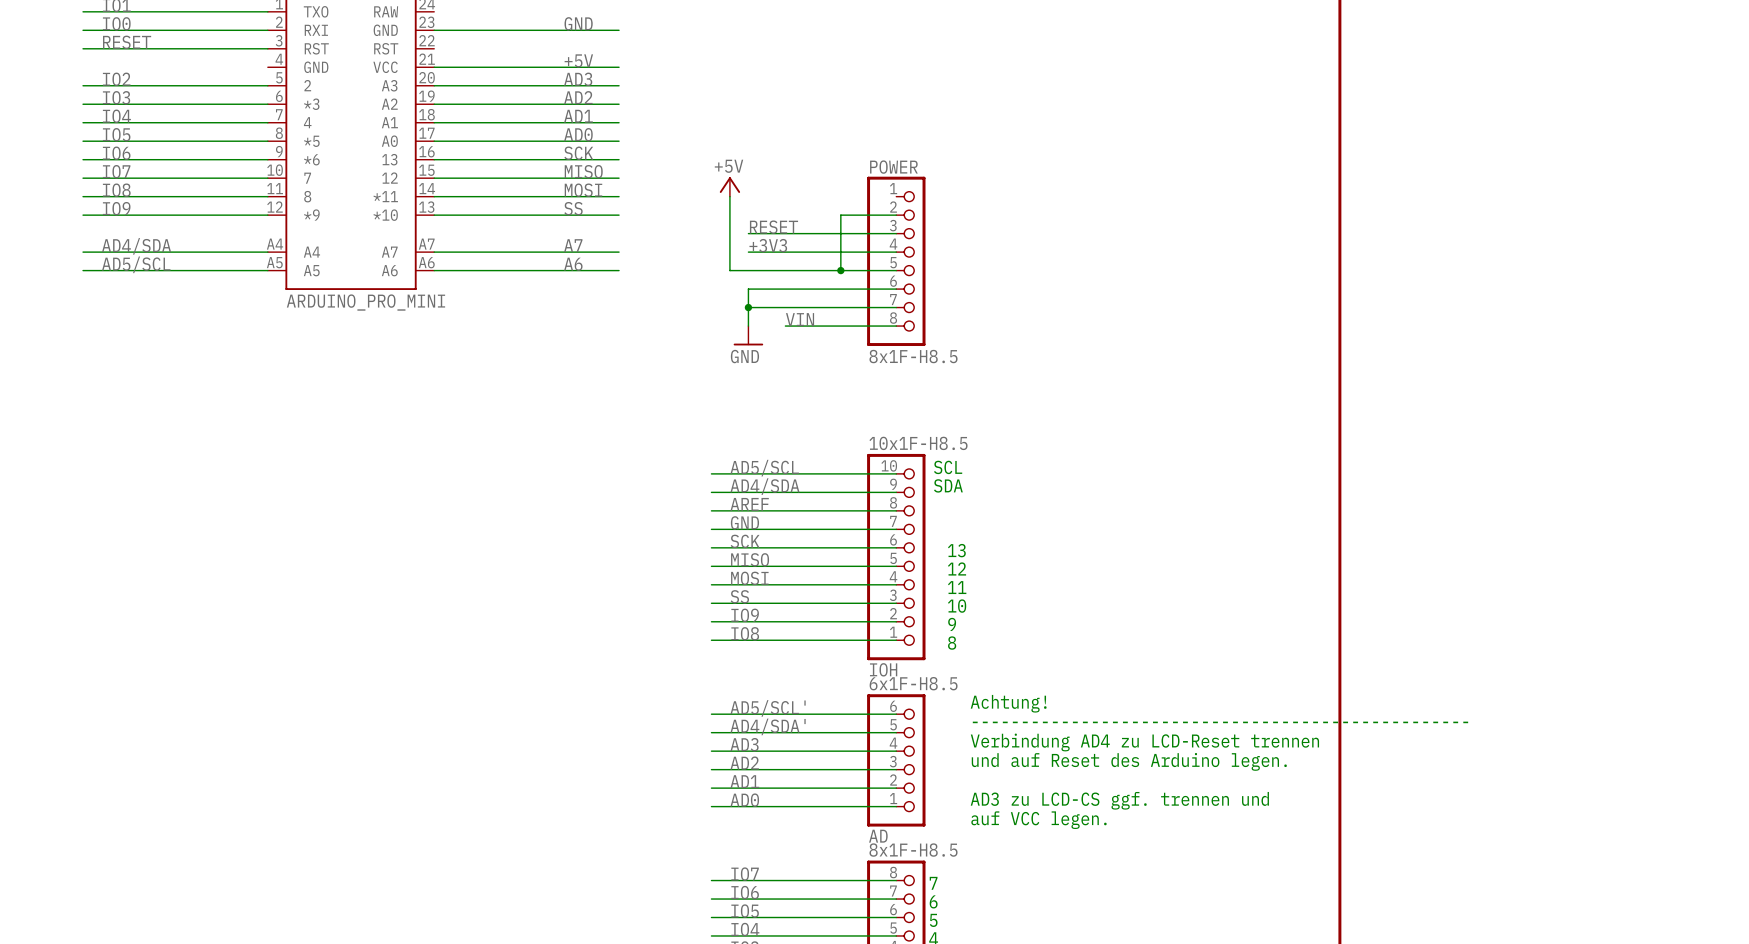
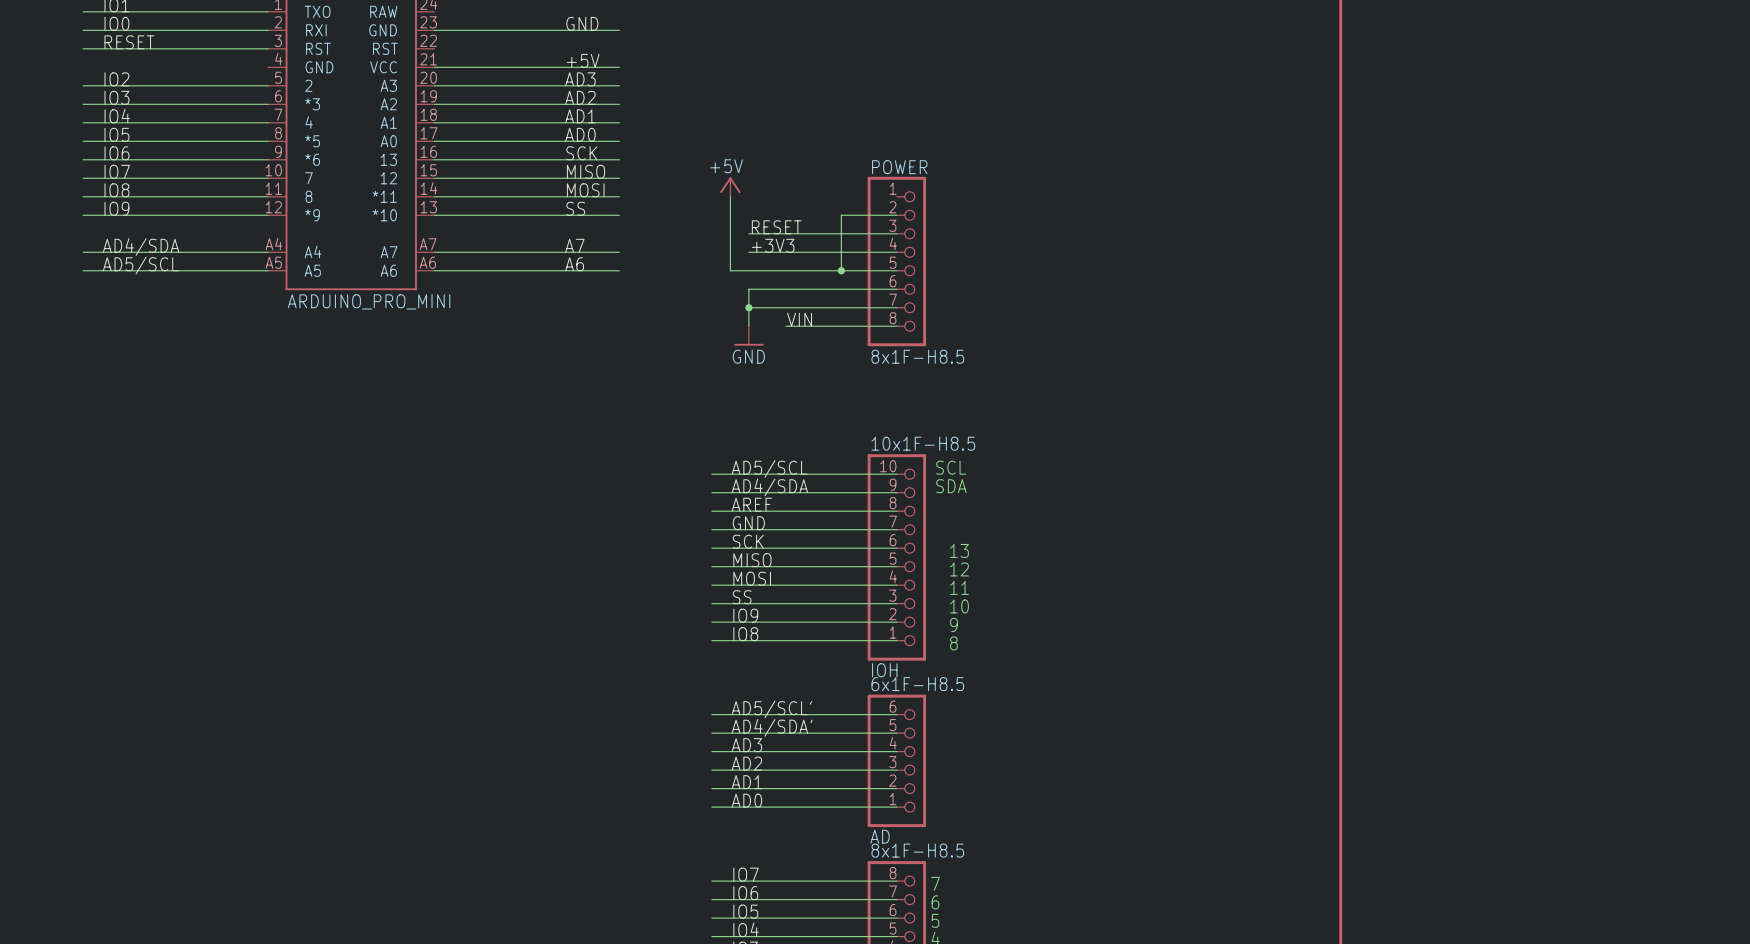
text: Achtung! (1008, 703) -> none
text: -------------------------------------------------- (1220, 722) -> none
text: Verbindung AD4 zu LCD-Reset trennen (1144, 742) -> none
text: und auf Reset des Arduino legen. (1129, 761) -> none
text: AD3 zu LCD-CS ggf. trennen und (1119, 800) -> none
text: auf VCC legen. (1038, 820) -> none

